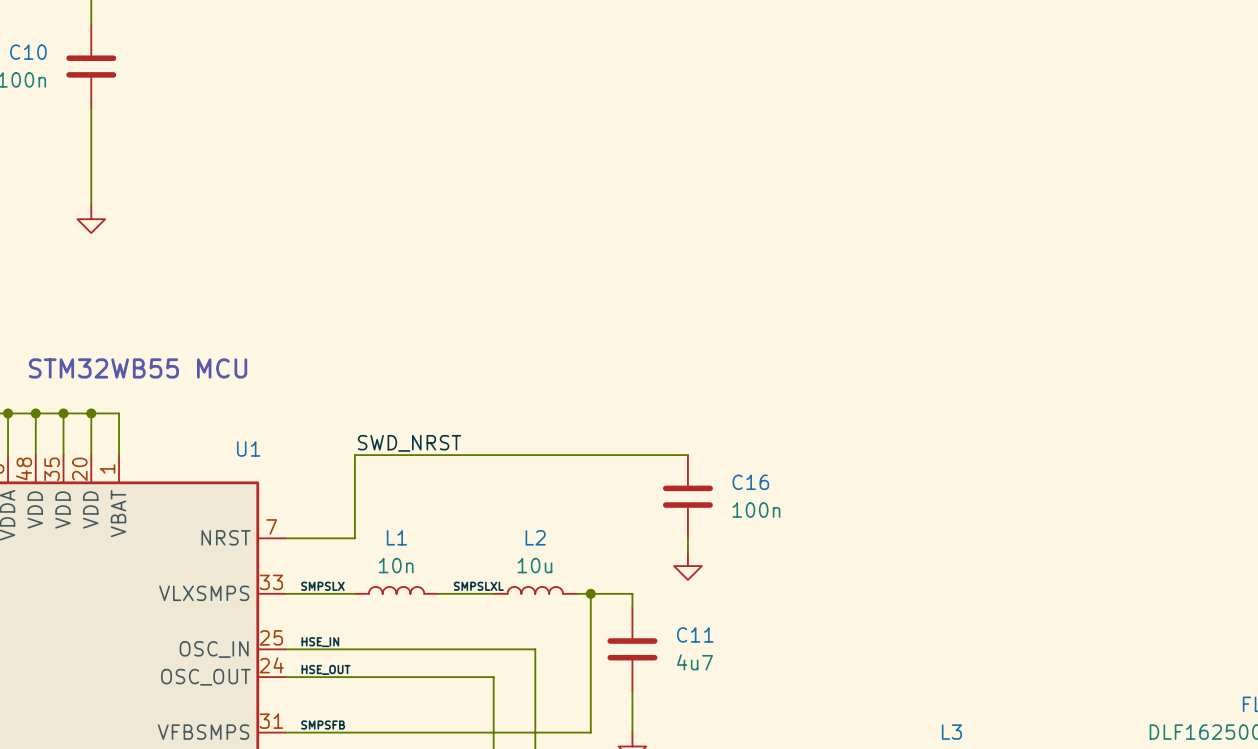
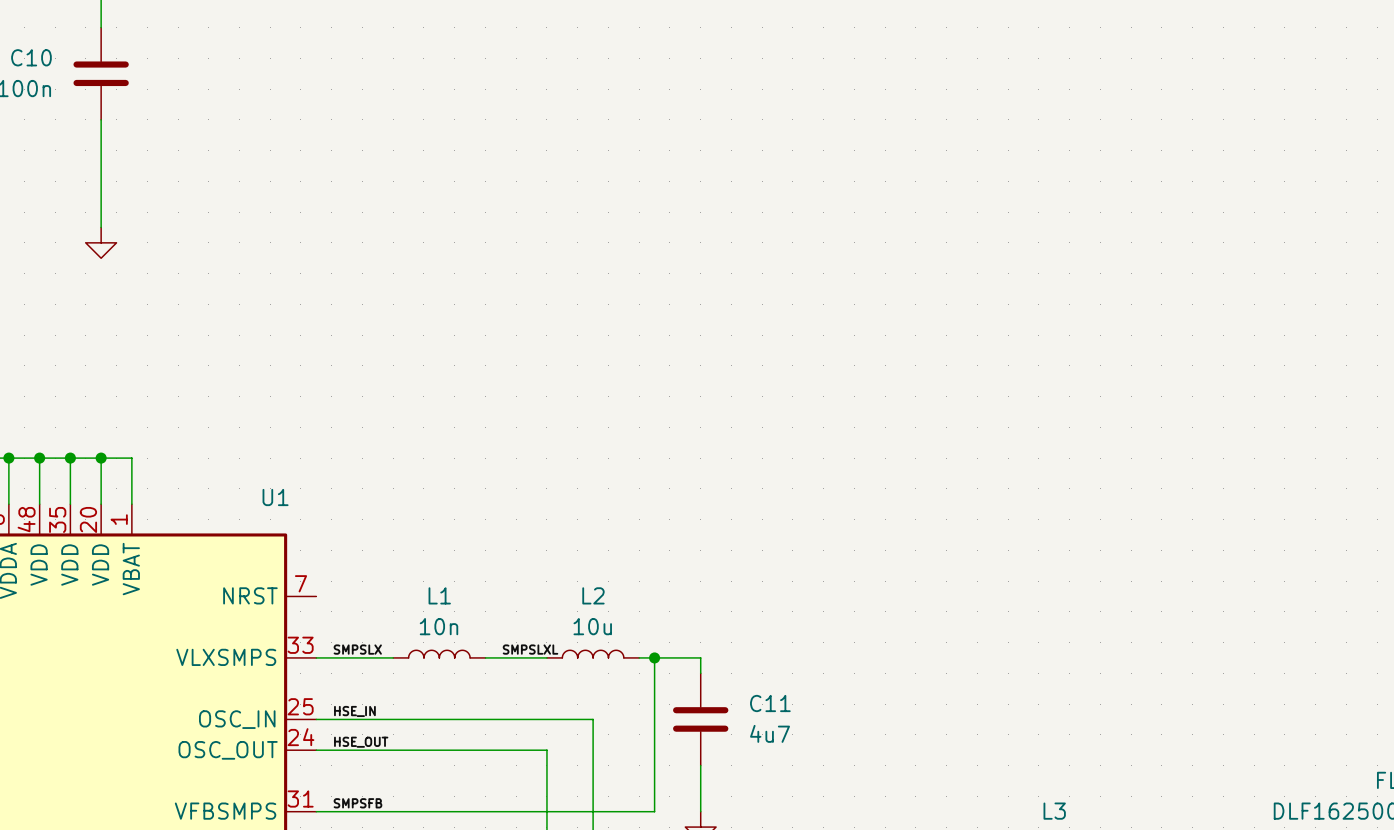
text: STM32WB55 MCU (138, 368) -> none
label: SWD_NRST (409, 443) -> none
wire: (687, 455) (354, 455) (354, 538) (285, 538) -> none
C16: 100n (687, 496) -> none
wire: (687, 538) (687, 552) -> none
power symbol: (687, 566) -> none

